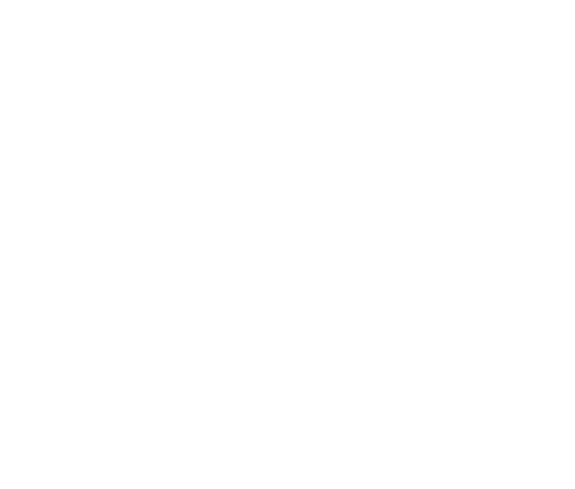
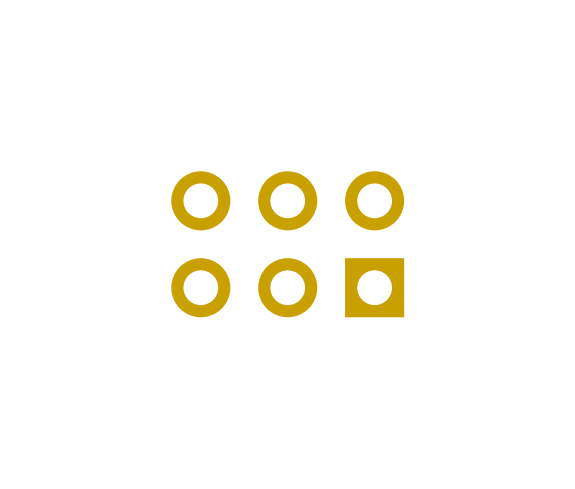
part: none -> (287, 244)

